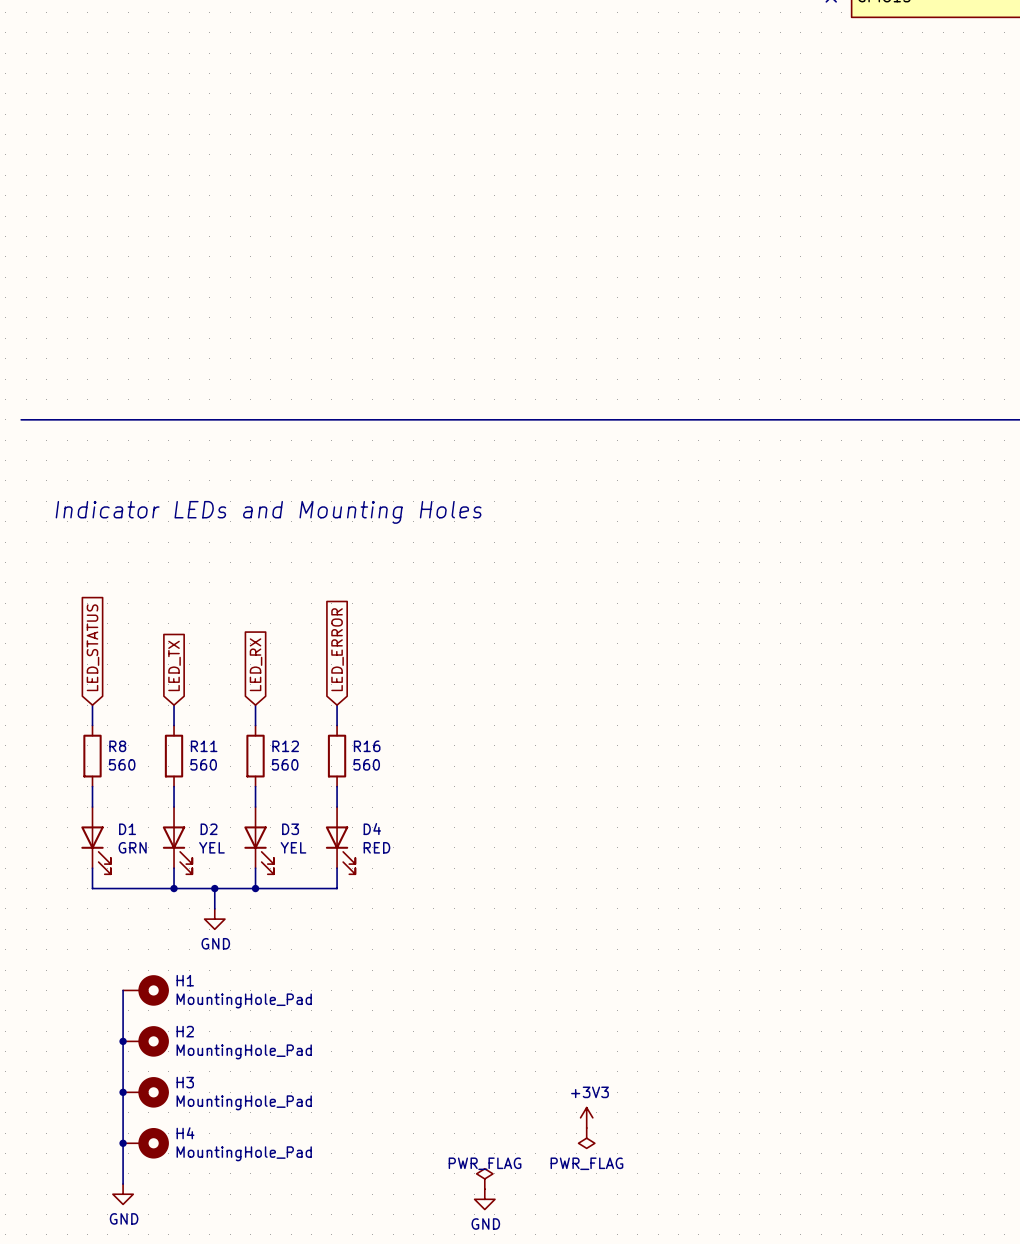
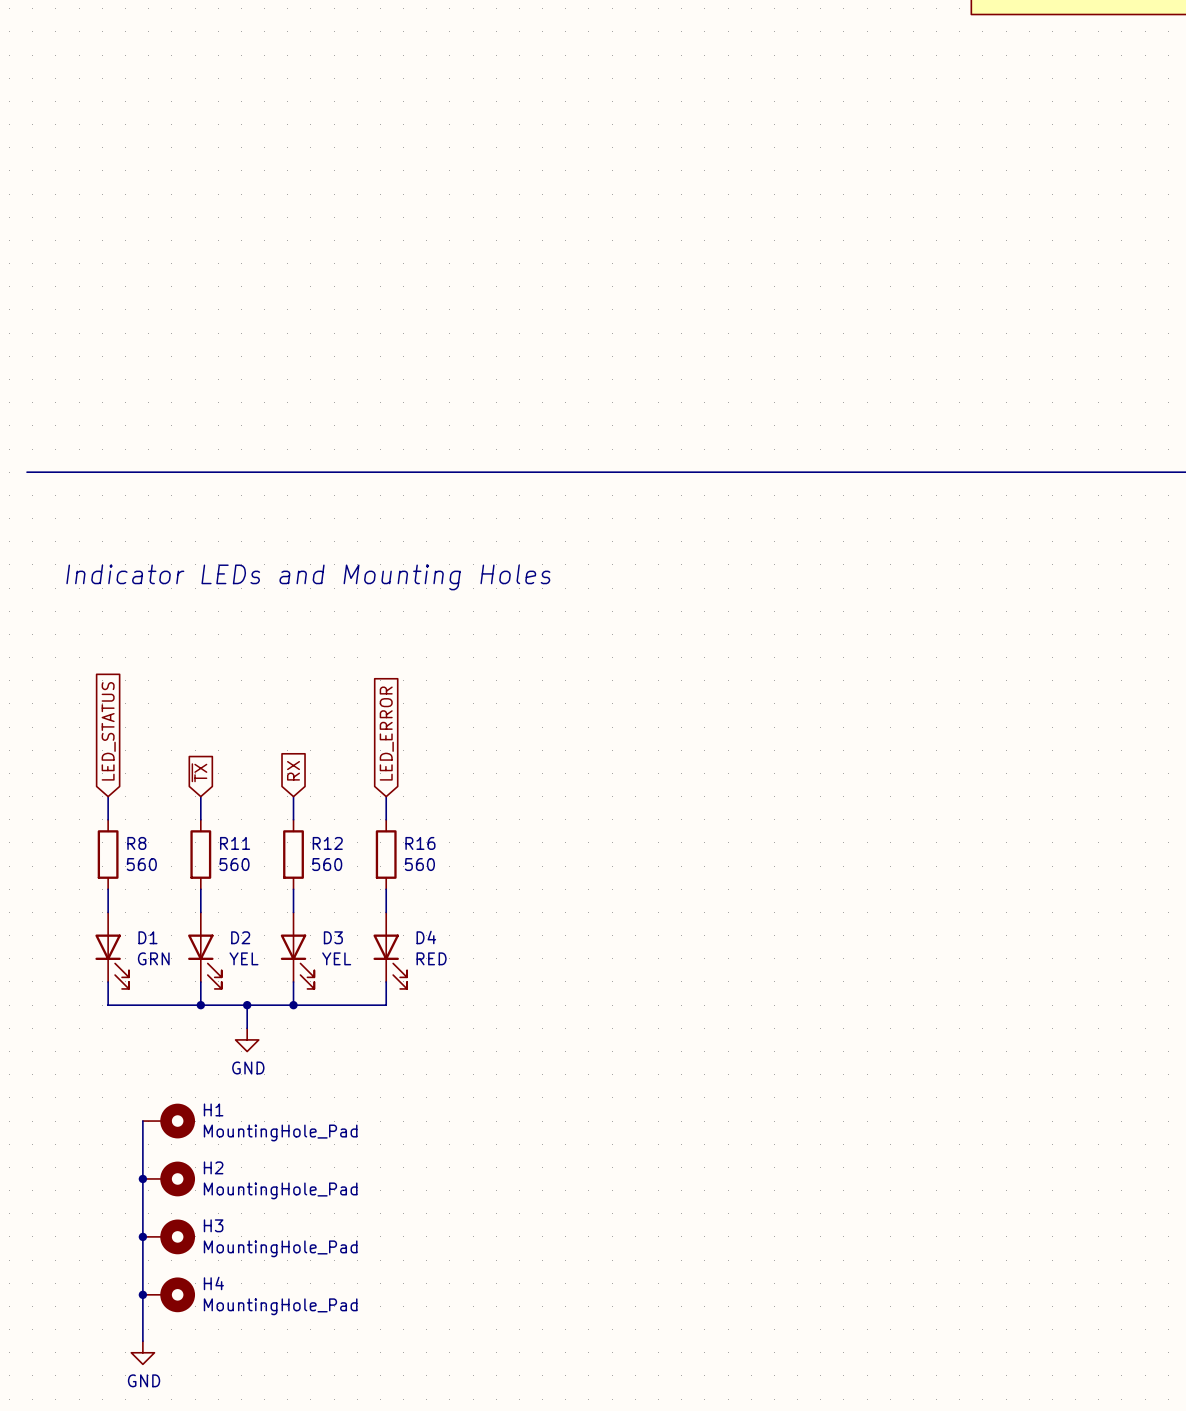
global label: LED_RX (256, 664) -> RX (293, 770)
global label: LED_TX (174, 665) -> ~{TX} (199, 772)
power symbol: +3V3 (586, 1117) -> none
power symbol: PWR_FLAG (586, 1138) -> none
power symbol: PWR_FLAG (484, 1178) -> none
power symbol: GND (484, 1199) -> none

